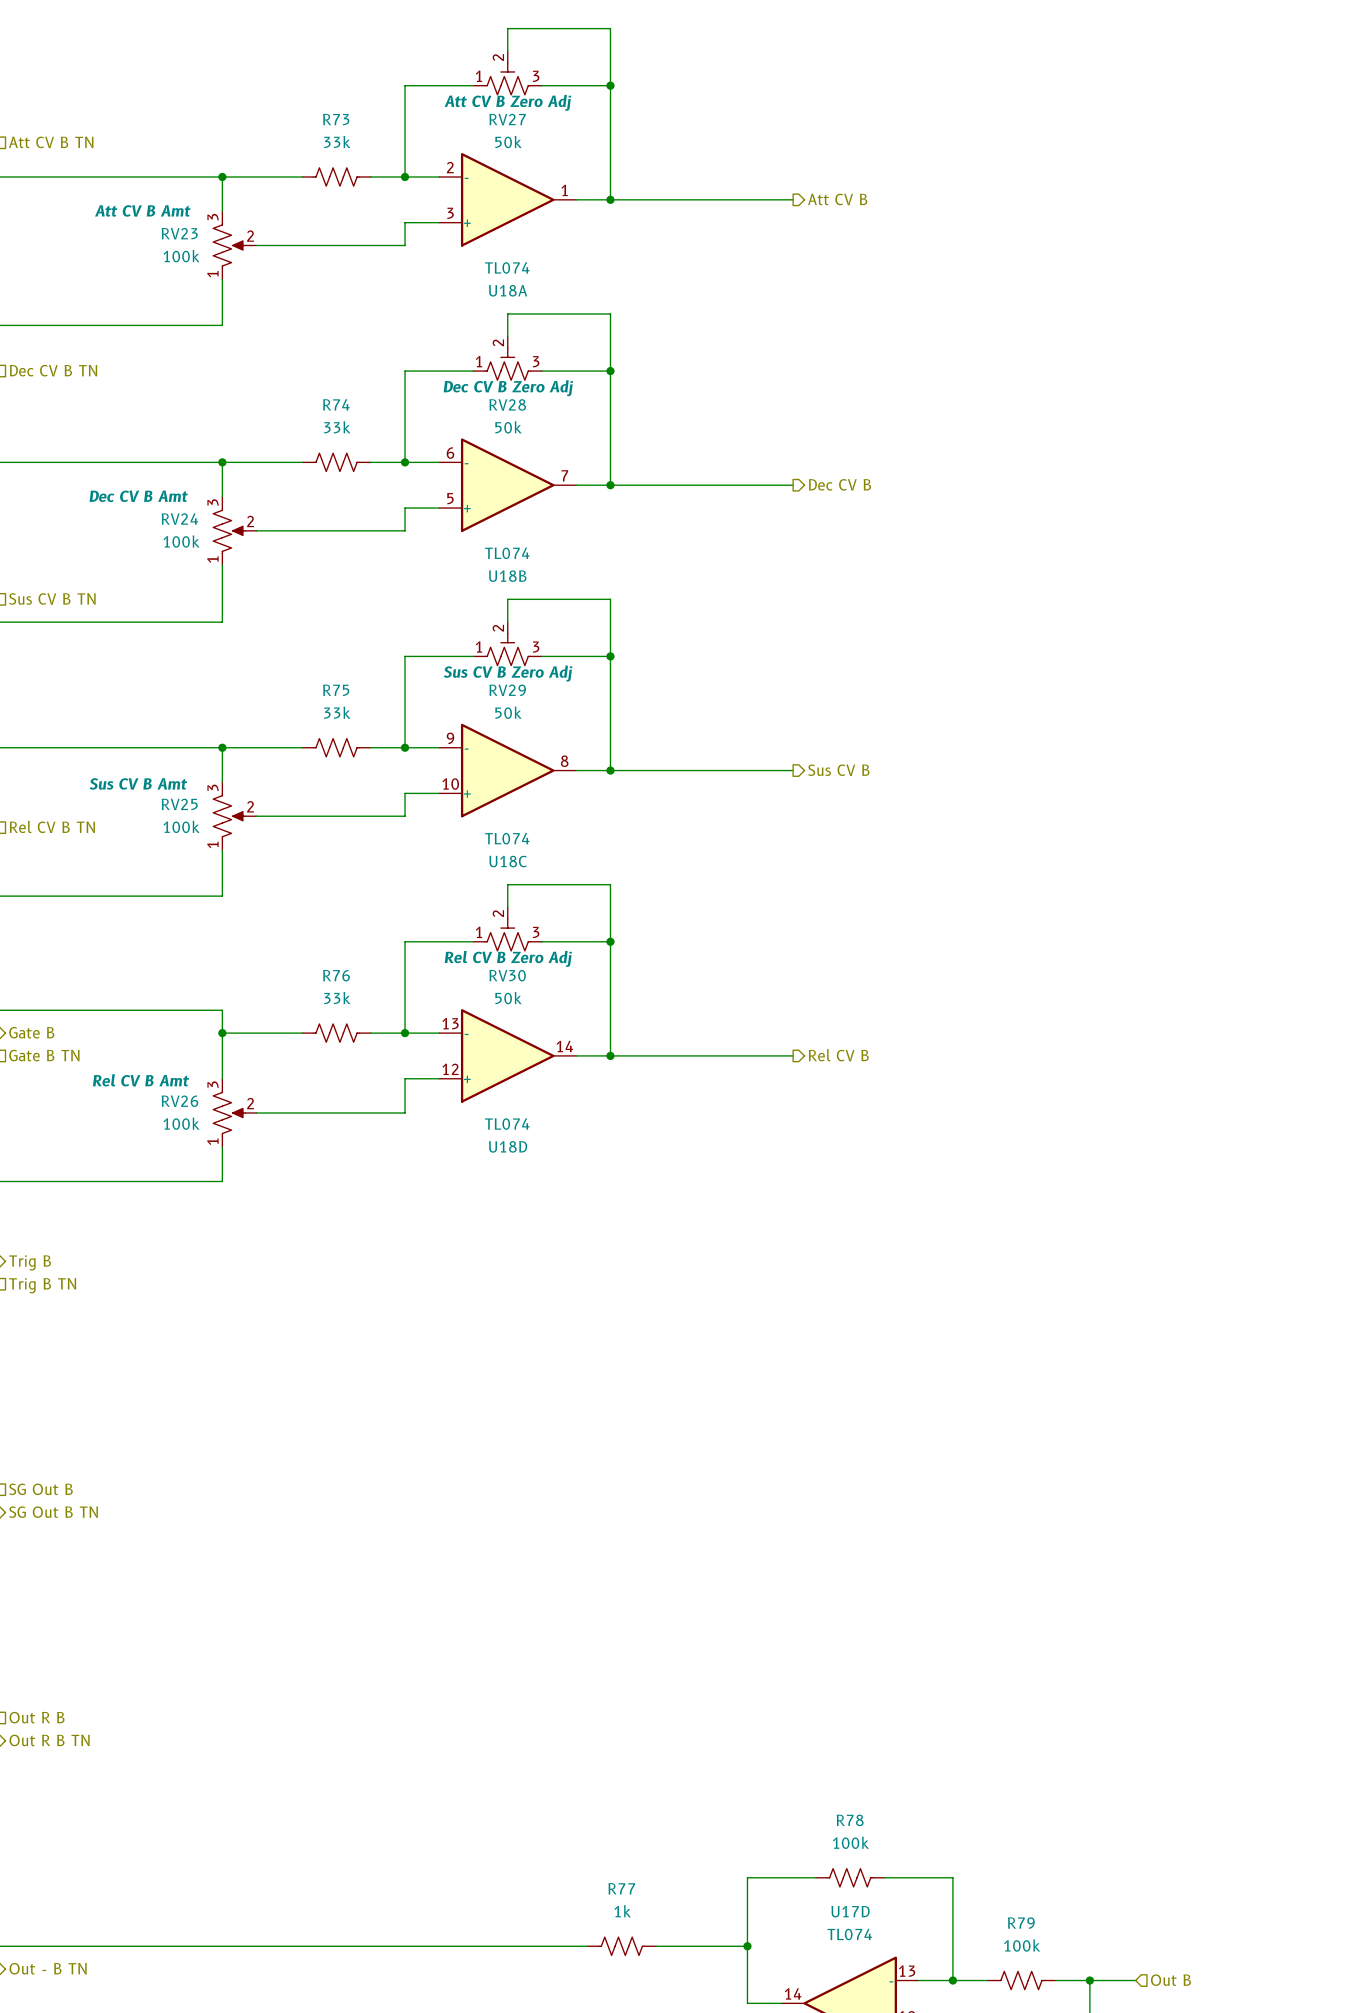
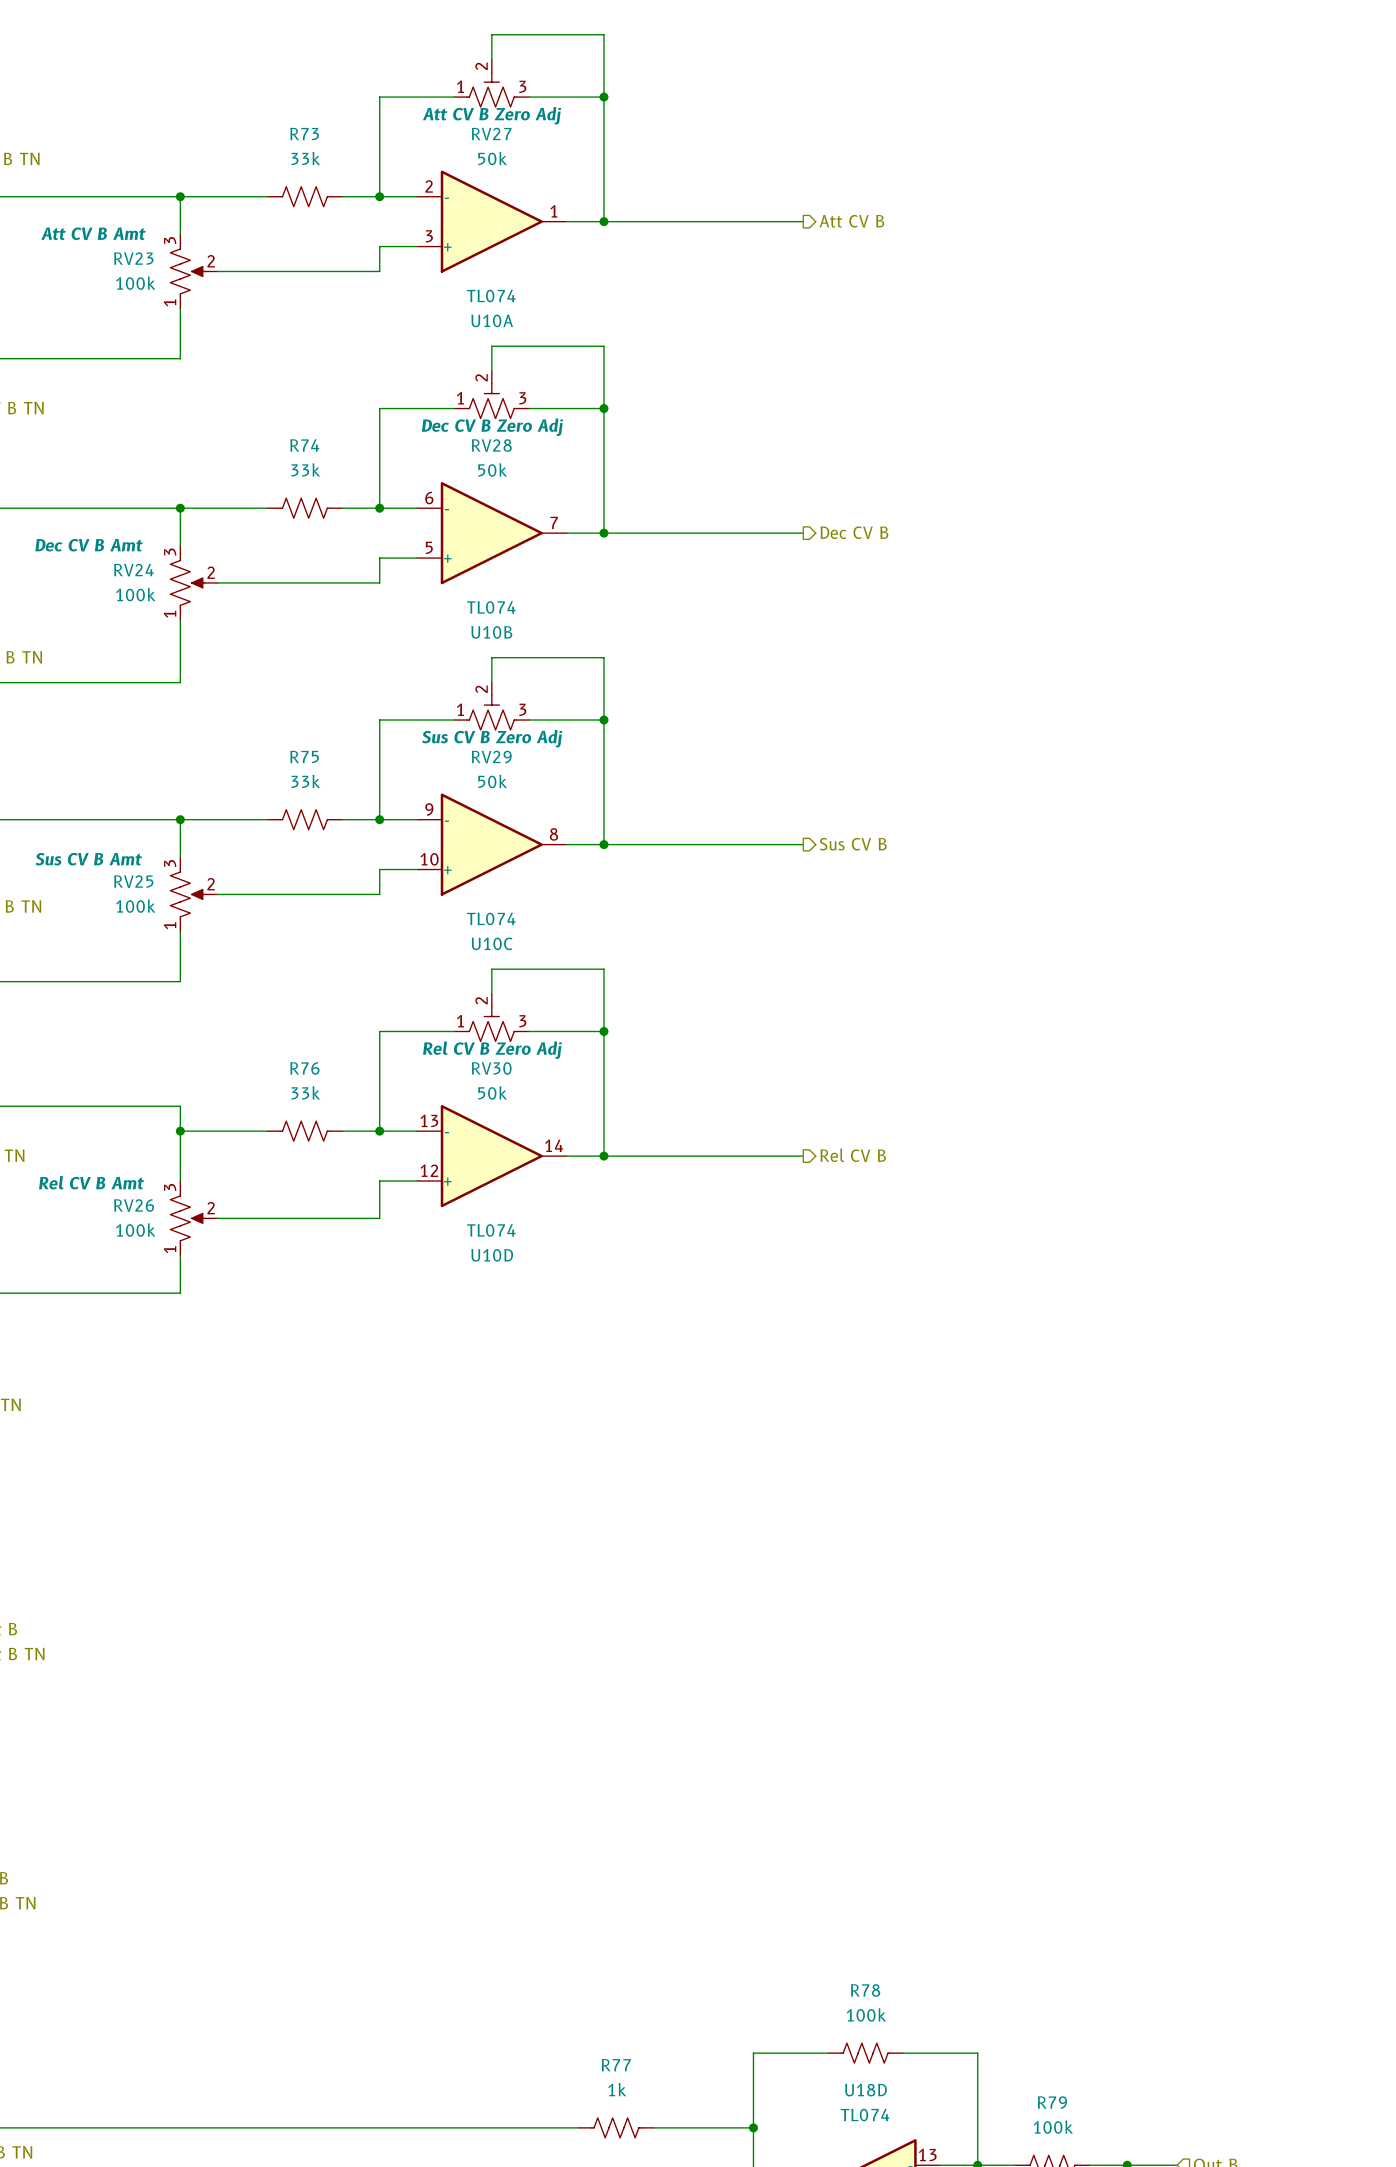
U18A name: U18A (508, 290) -> U10A (492, 320)
U18B name: U18B (507, 576) -> U10B (491, 632)
U18C name: U18C (508, 861) -> U10C (492, 943)
U18D name: U18D (508, 1146) -> U10D (492, 1255)
U17D name: U17D (850, 1911) -> U18D (865, 2090)

